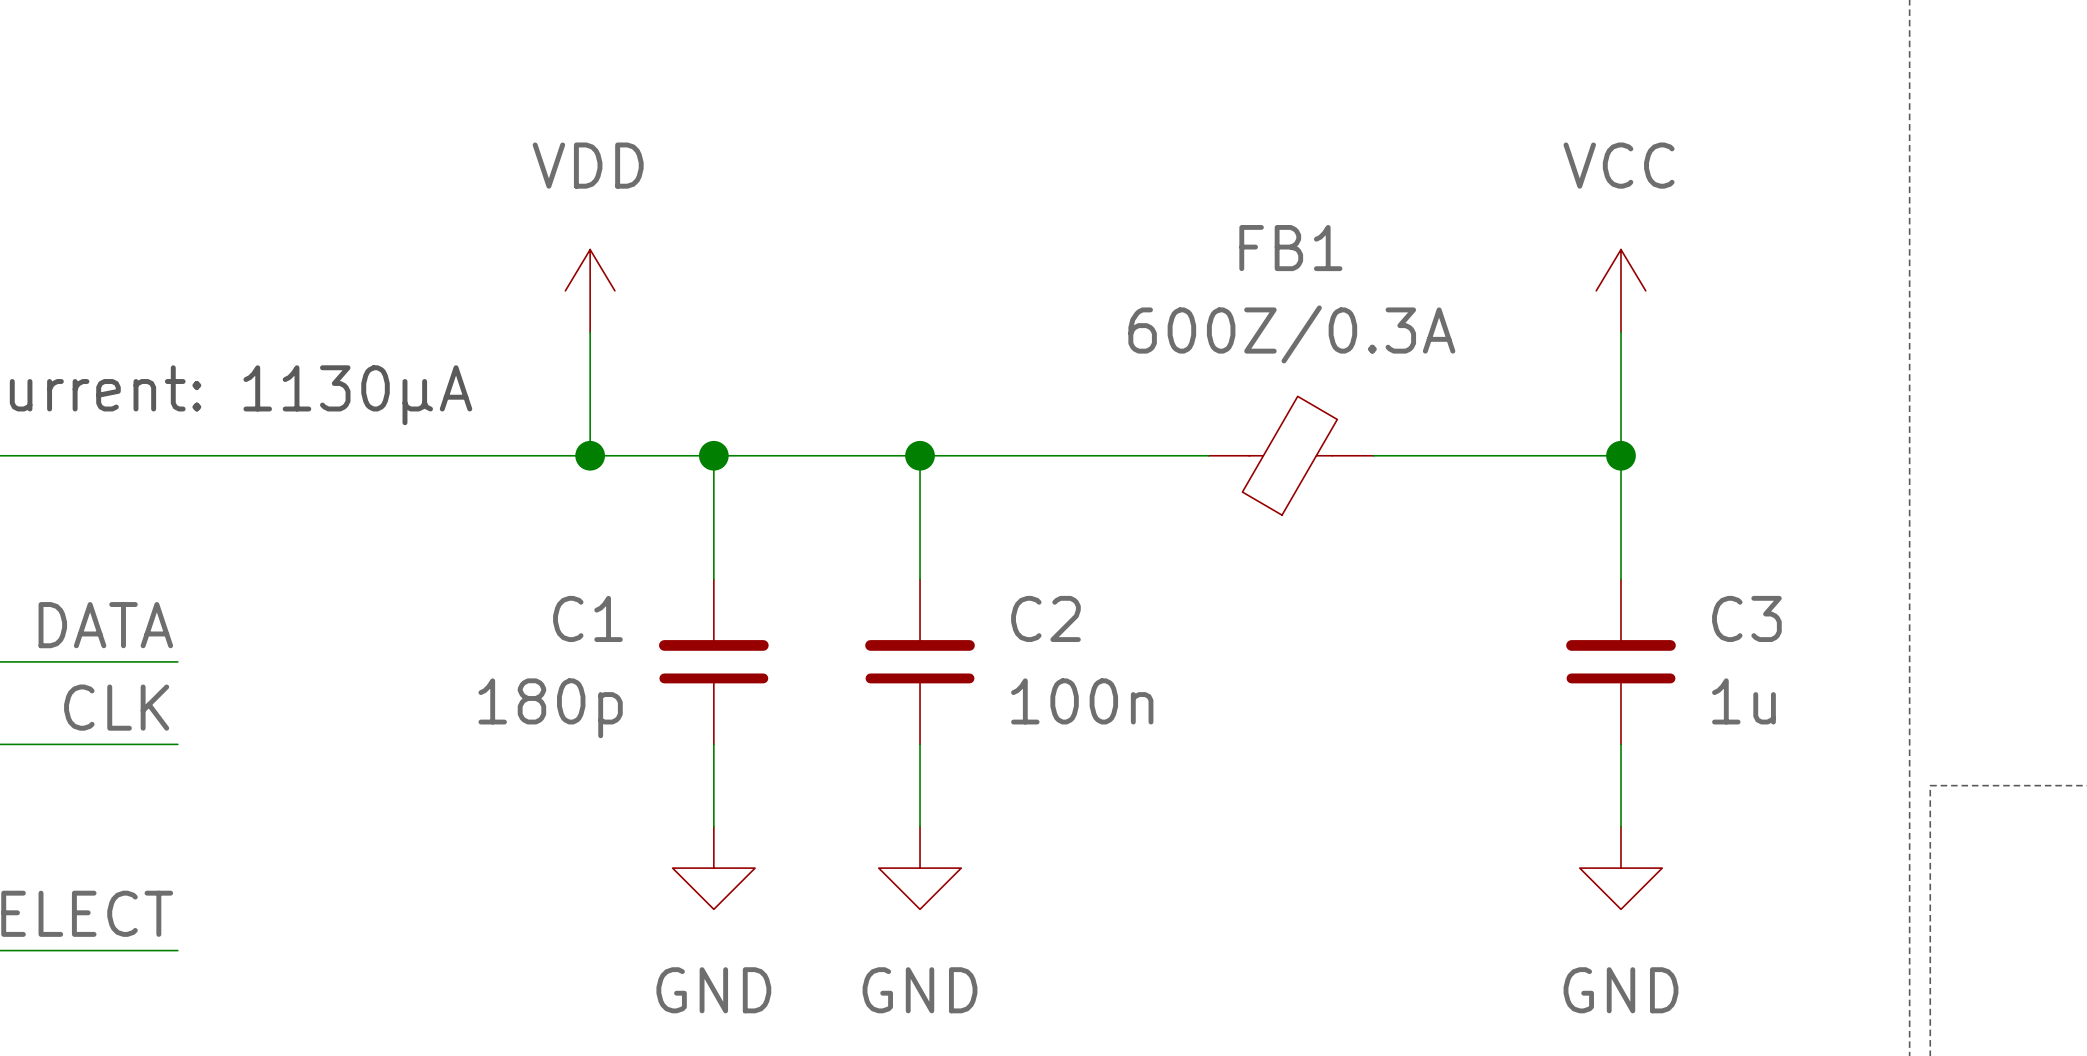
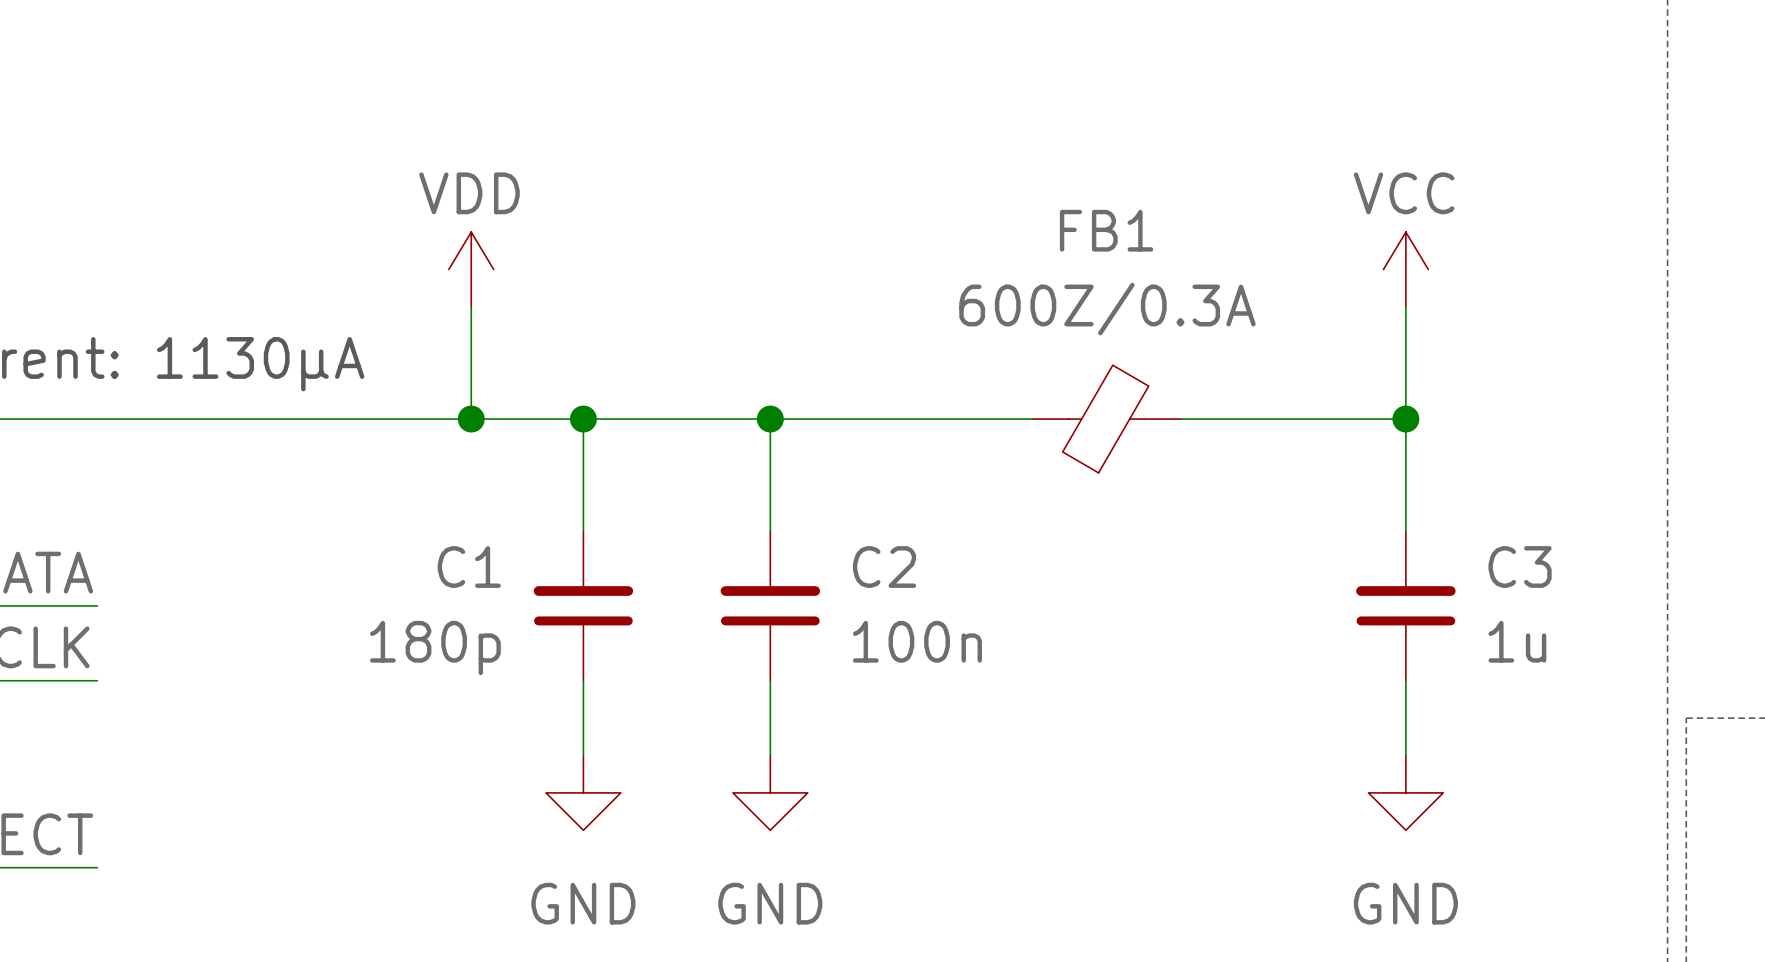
power symbol text position: VDD (588, 165) -> VDD (469, 193)
power symbol text position: VCC (1619, 165) -> VCC (1404, 193)

